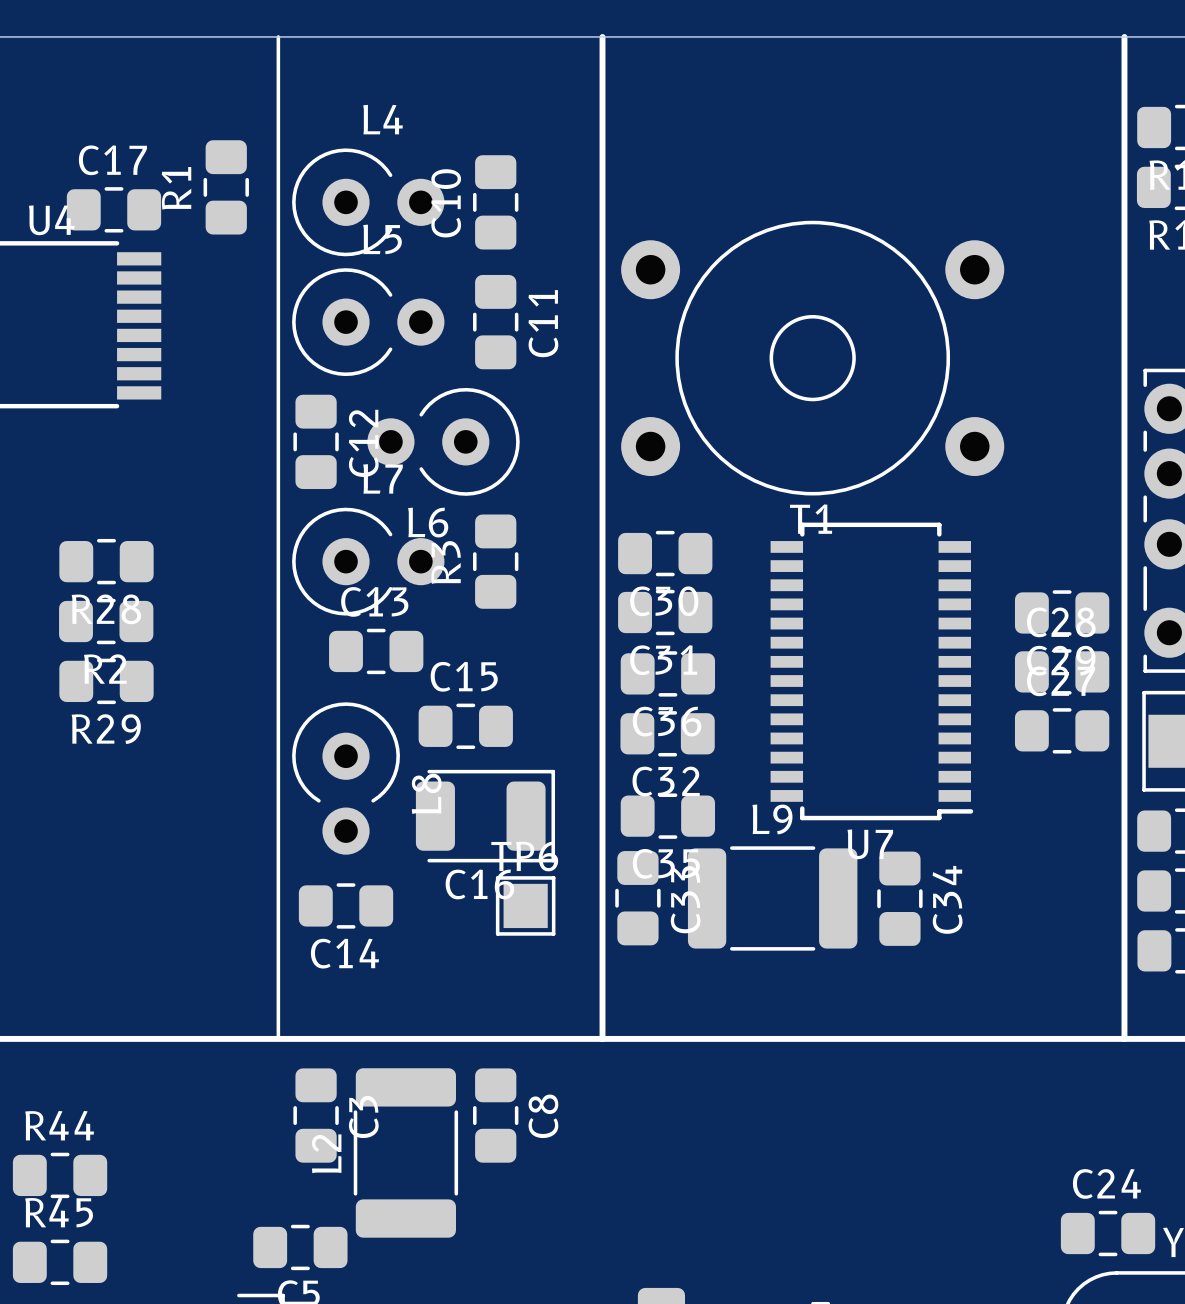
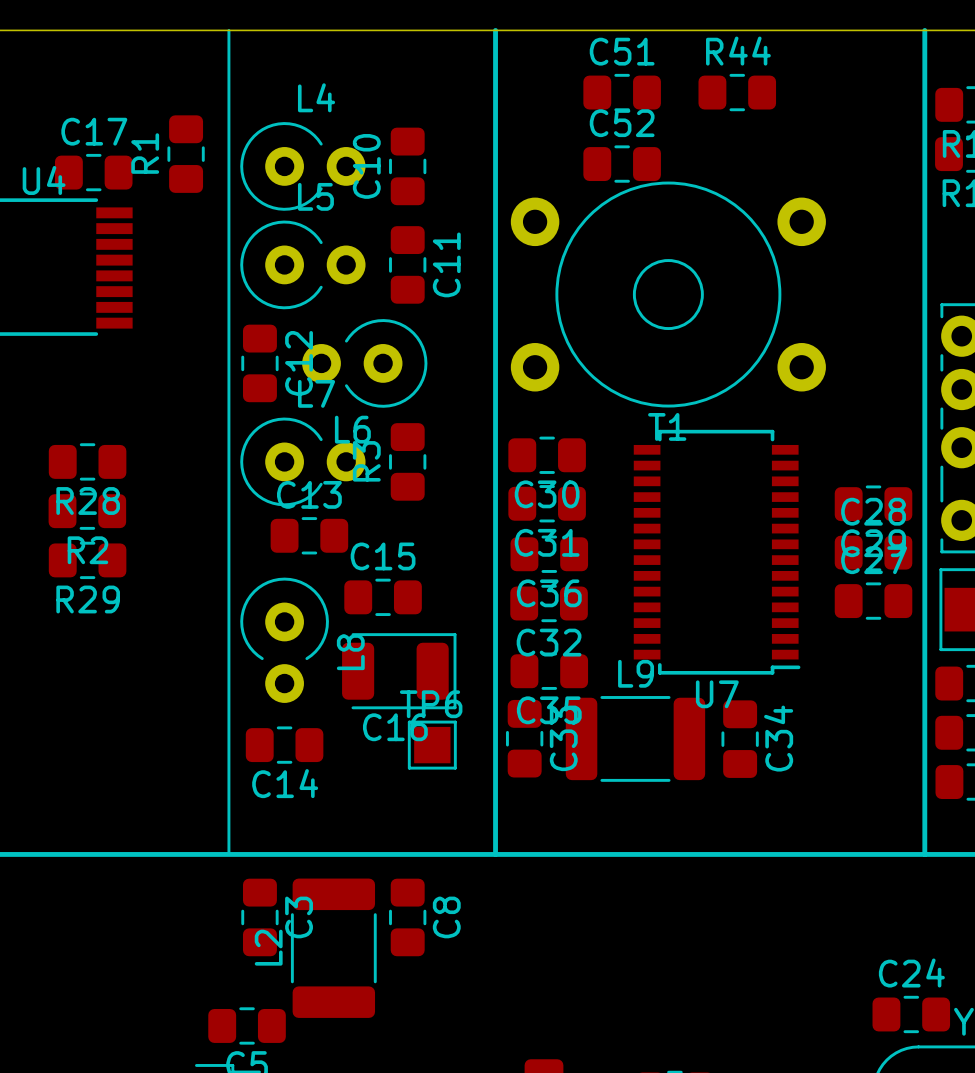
C51: none -> (622, 92)
C52: none -> (622, 164)
R44 position: (60, 1175) -> (737, 92)
R45: (60, 1262) -> none

